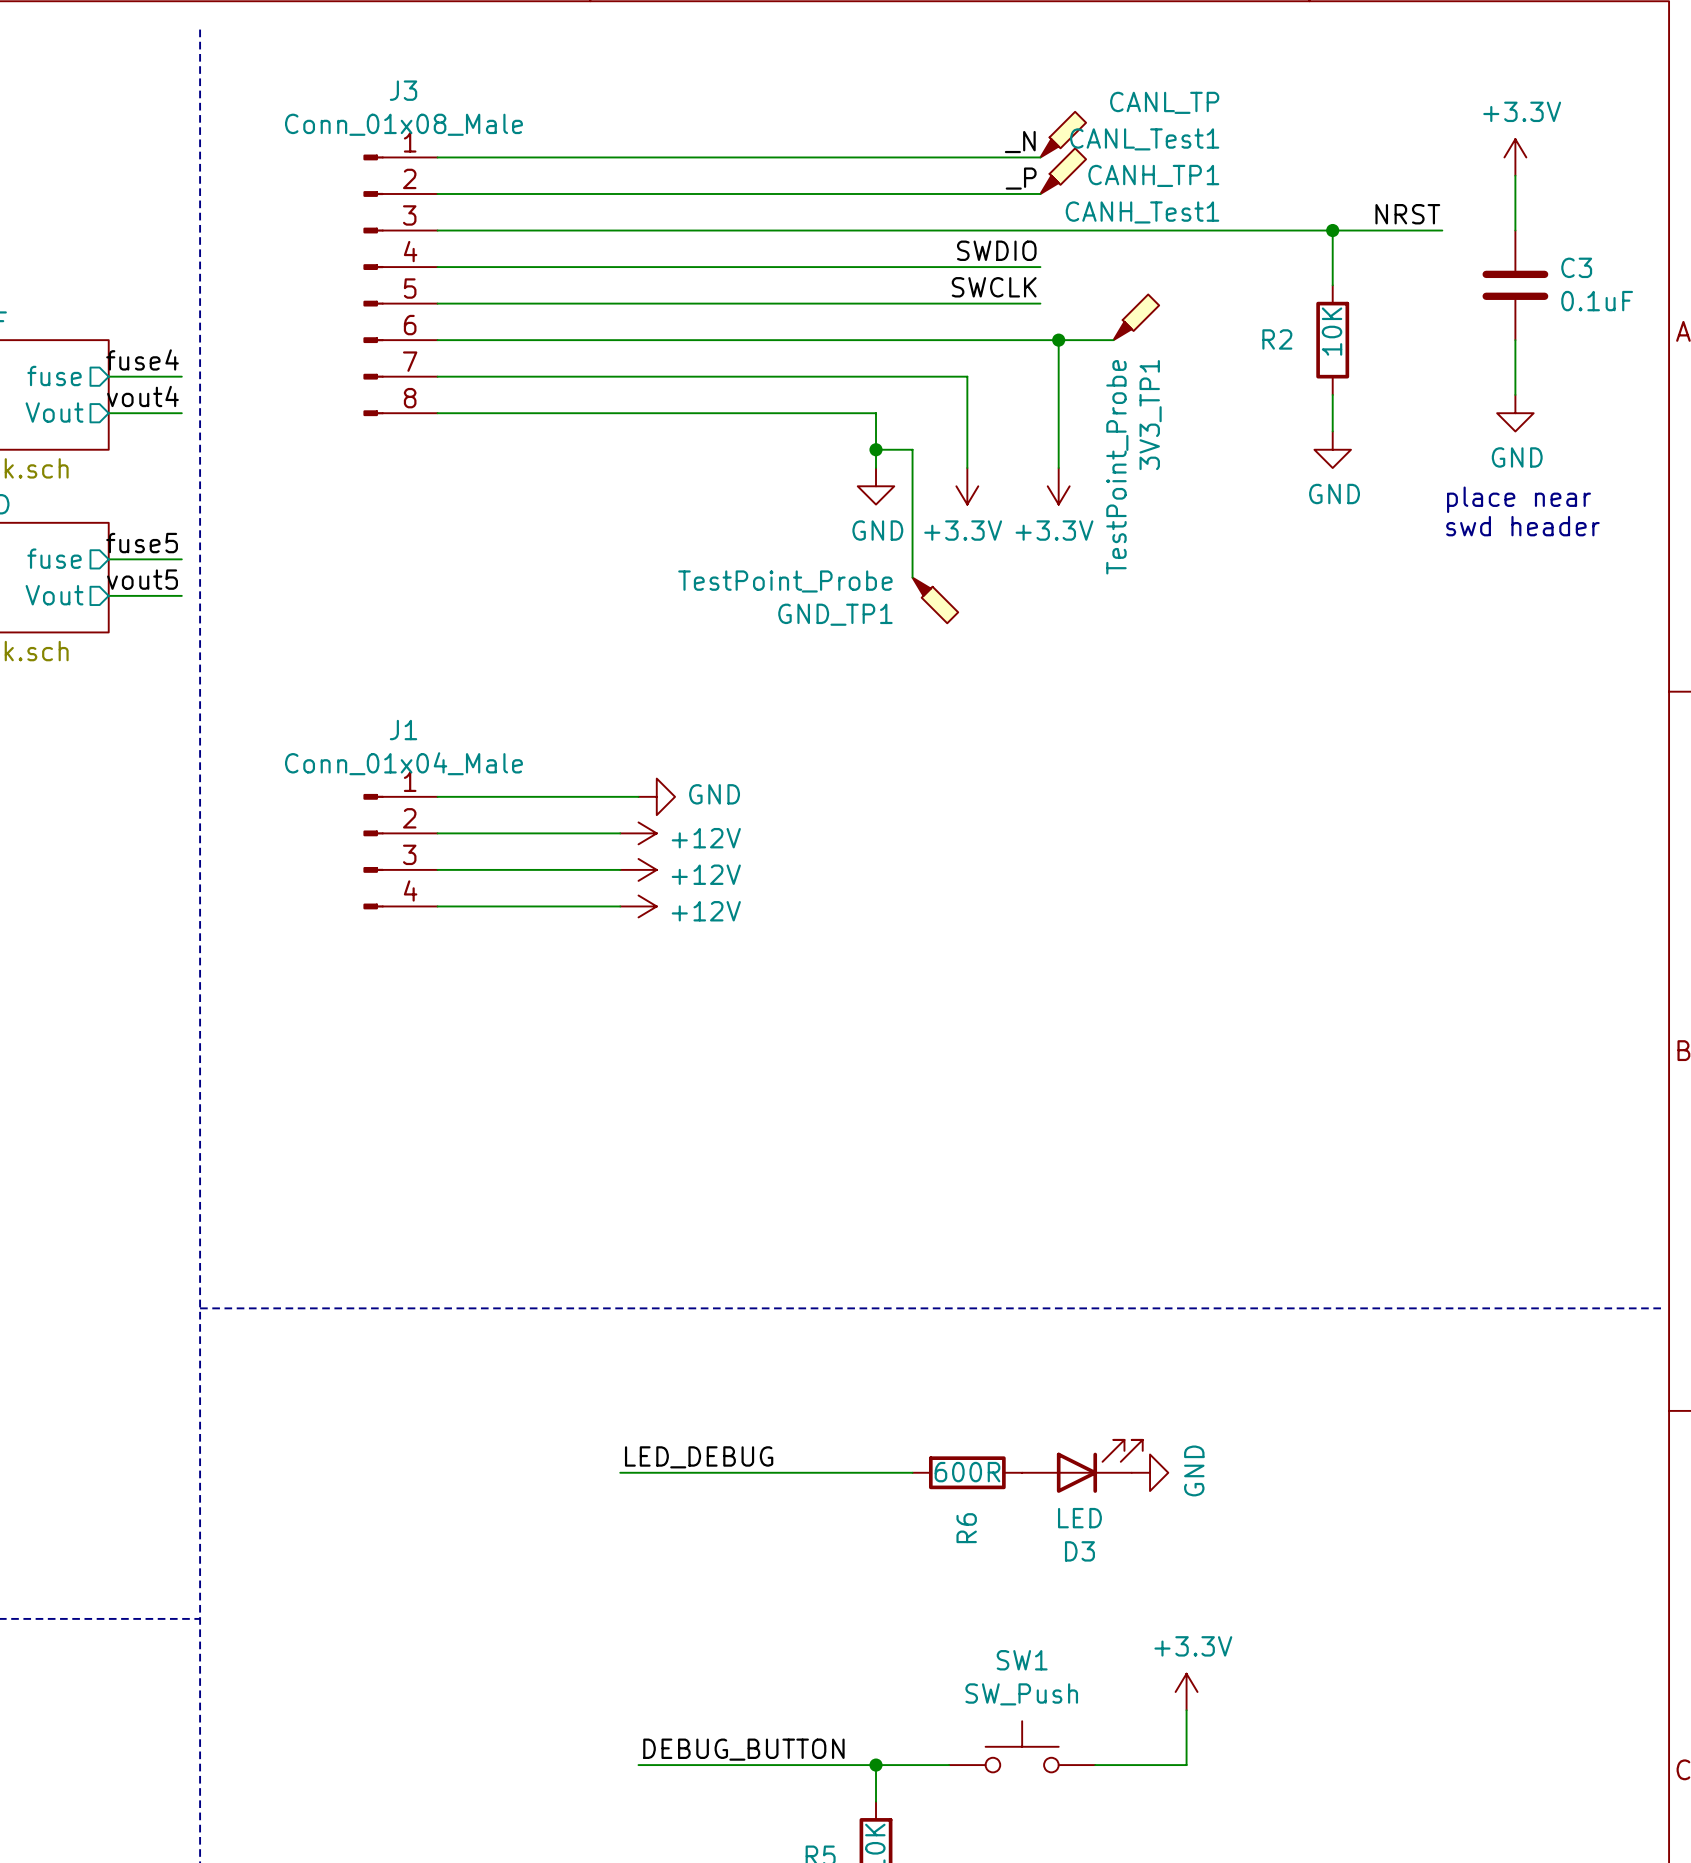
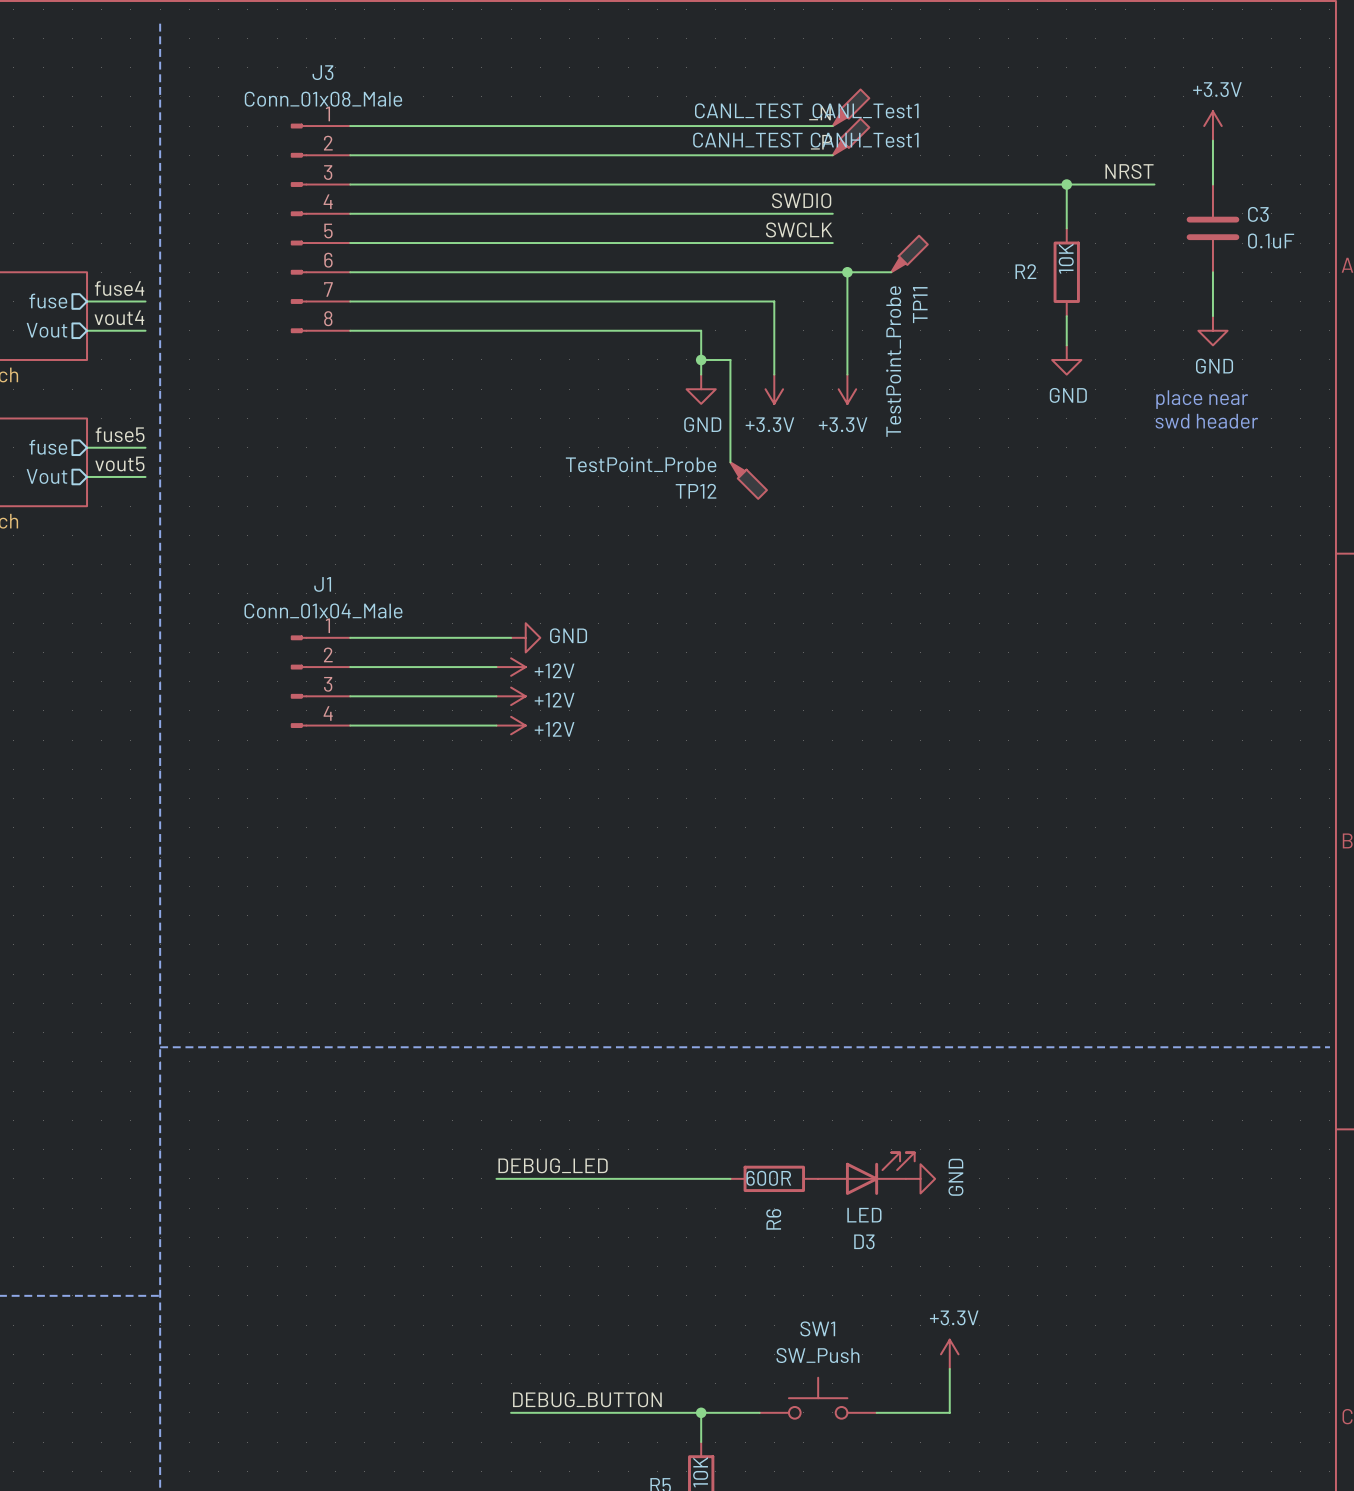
CANL_Test1 value: CANL_TP (1164, 102) -> CANL_TEST (748, 110)
CANL_Test1 name position: CANL_Test1 (1144, 139) -> CANL_Test1 (865, 110)
CANH_TP1 name: CANH_TP1 (1153, 175) -> CANH_Test1 (864, 140)
CANH_TP1 value: CANH_Test1 (1142, 212) -> CANH_TEST (747, 140)
3V3_TP1 name: 3V3_TP1 (1150, 415) -> TP11 (920, 305)
GND_TP1 name: GND_TP1 (835, 614) -> TP12 (696, 491)
label: LED_DEBUG (699, 1457) -> DEBUG_LED (553, 1165)

